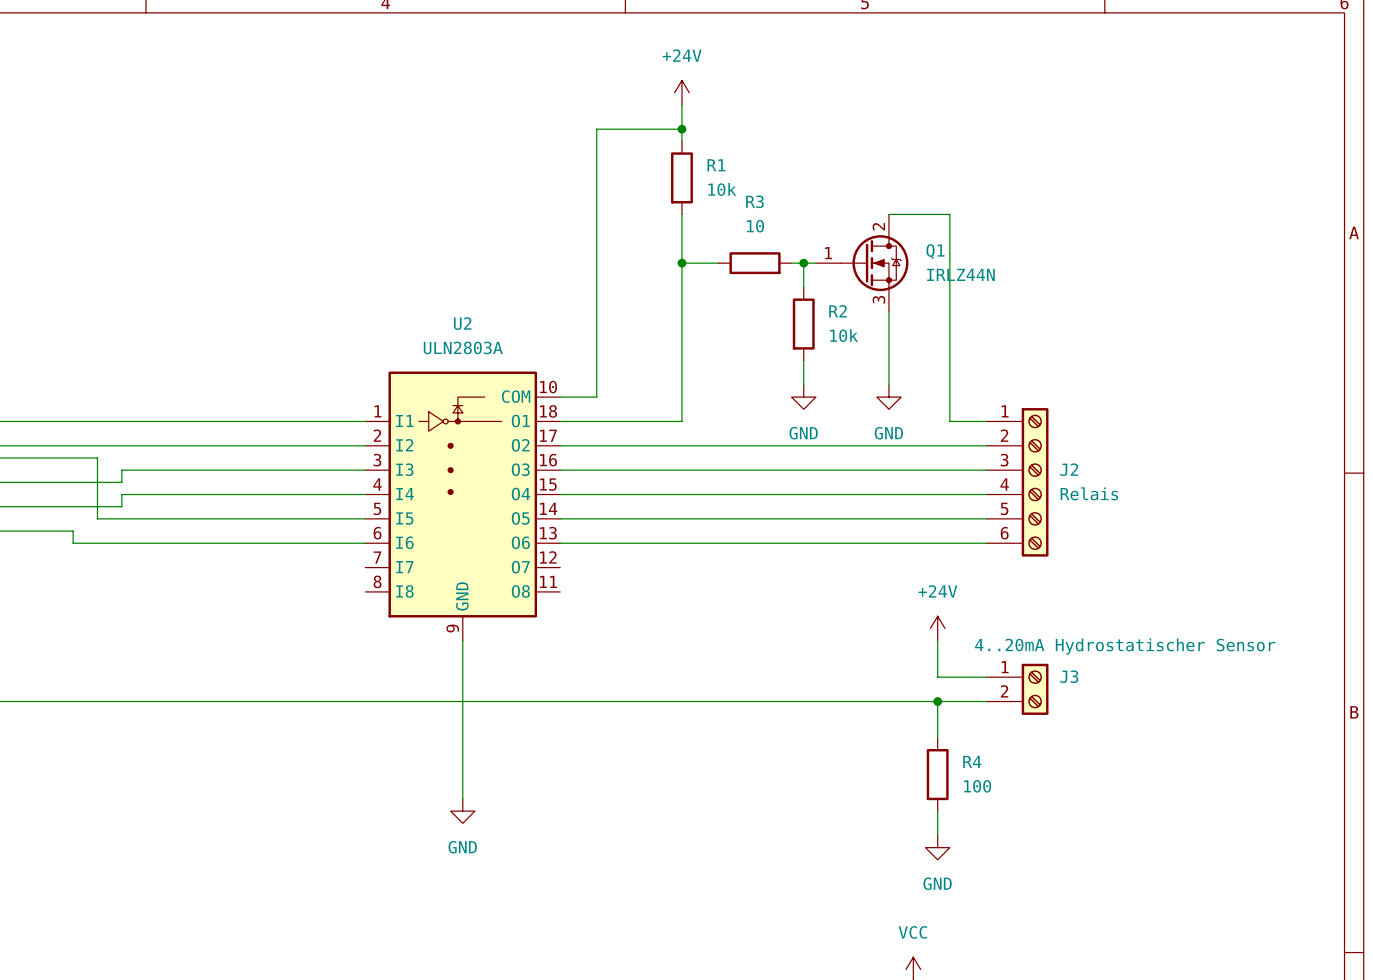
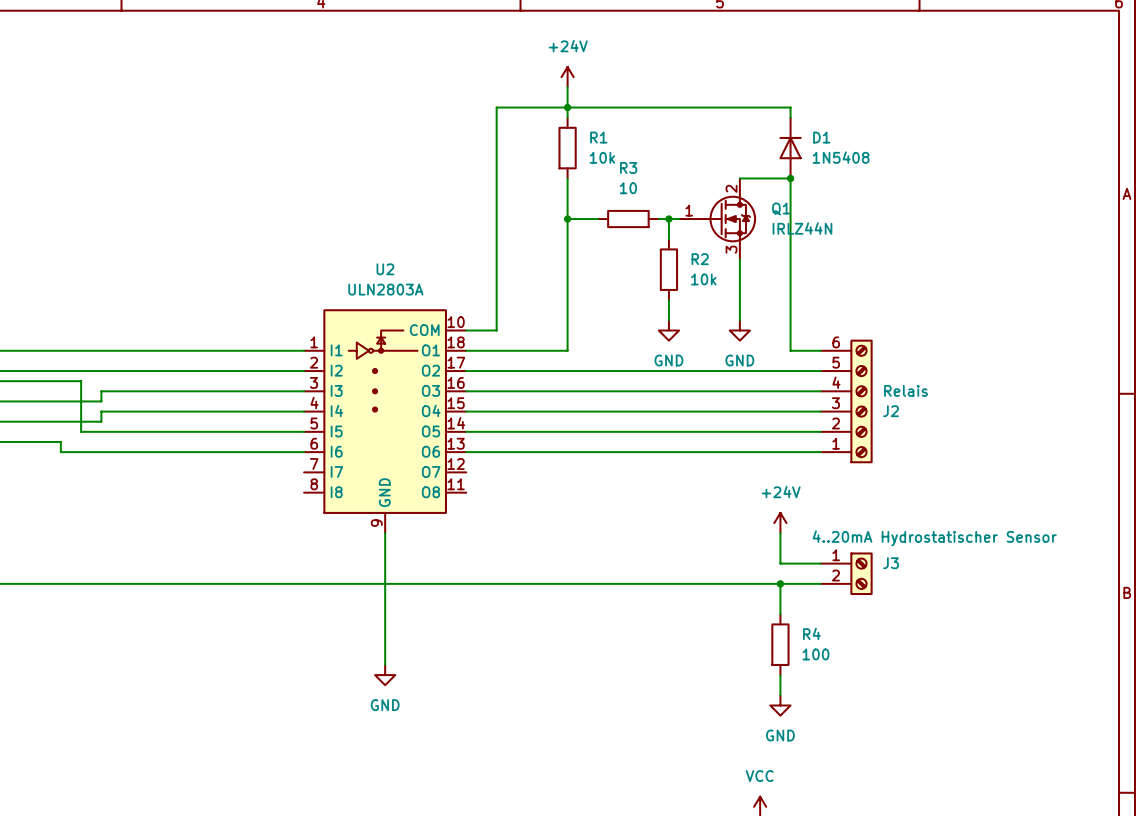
wire: none -> (567, 107) (790, 107) (790, 117)
D1: none -> 1N5408 (790, 148)
junction: none -> (790, 178)
J2 flip: as is (1035, 482) -> up-down (861, 401)

